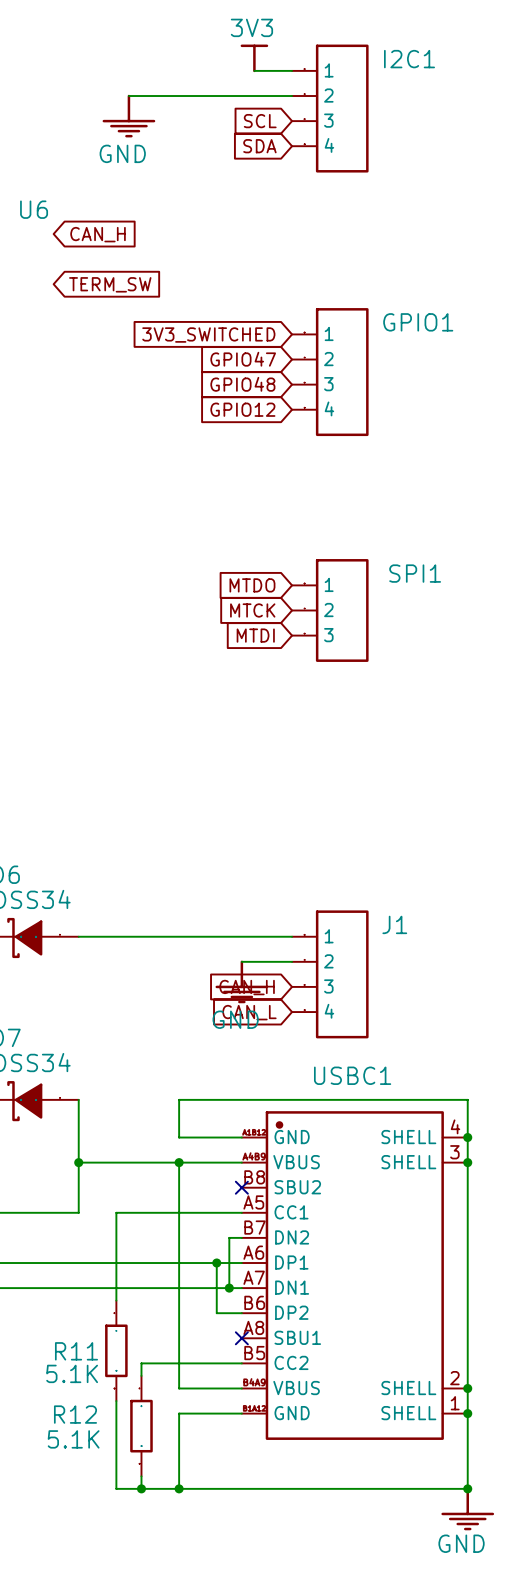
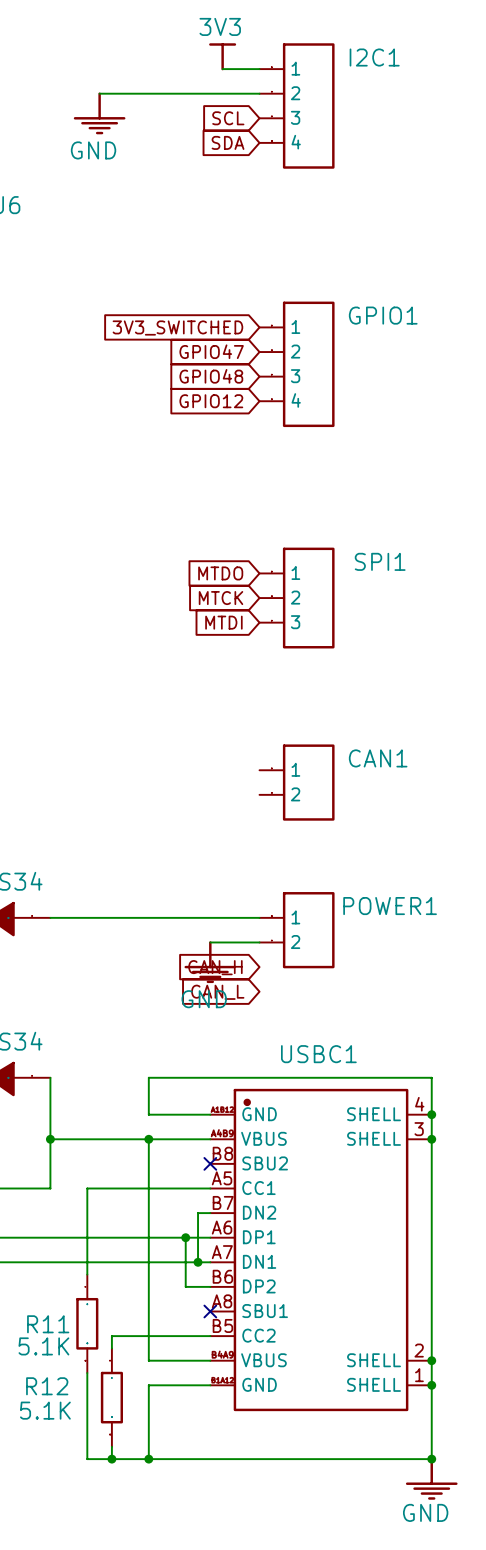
global label: CAN_H (98, 234) -> none
global label: TERM_SW (110, 284) -> none
CAN1: none -> (297, 782)
POWER1: none -> (297, 930)
J1: (330, 974) -> none

